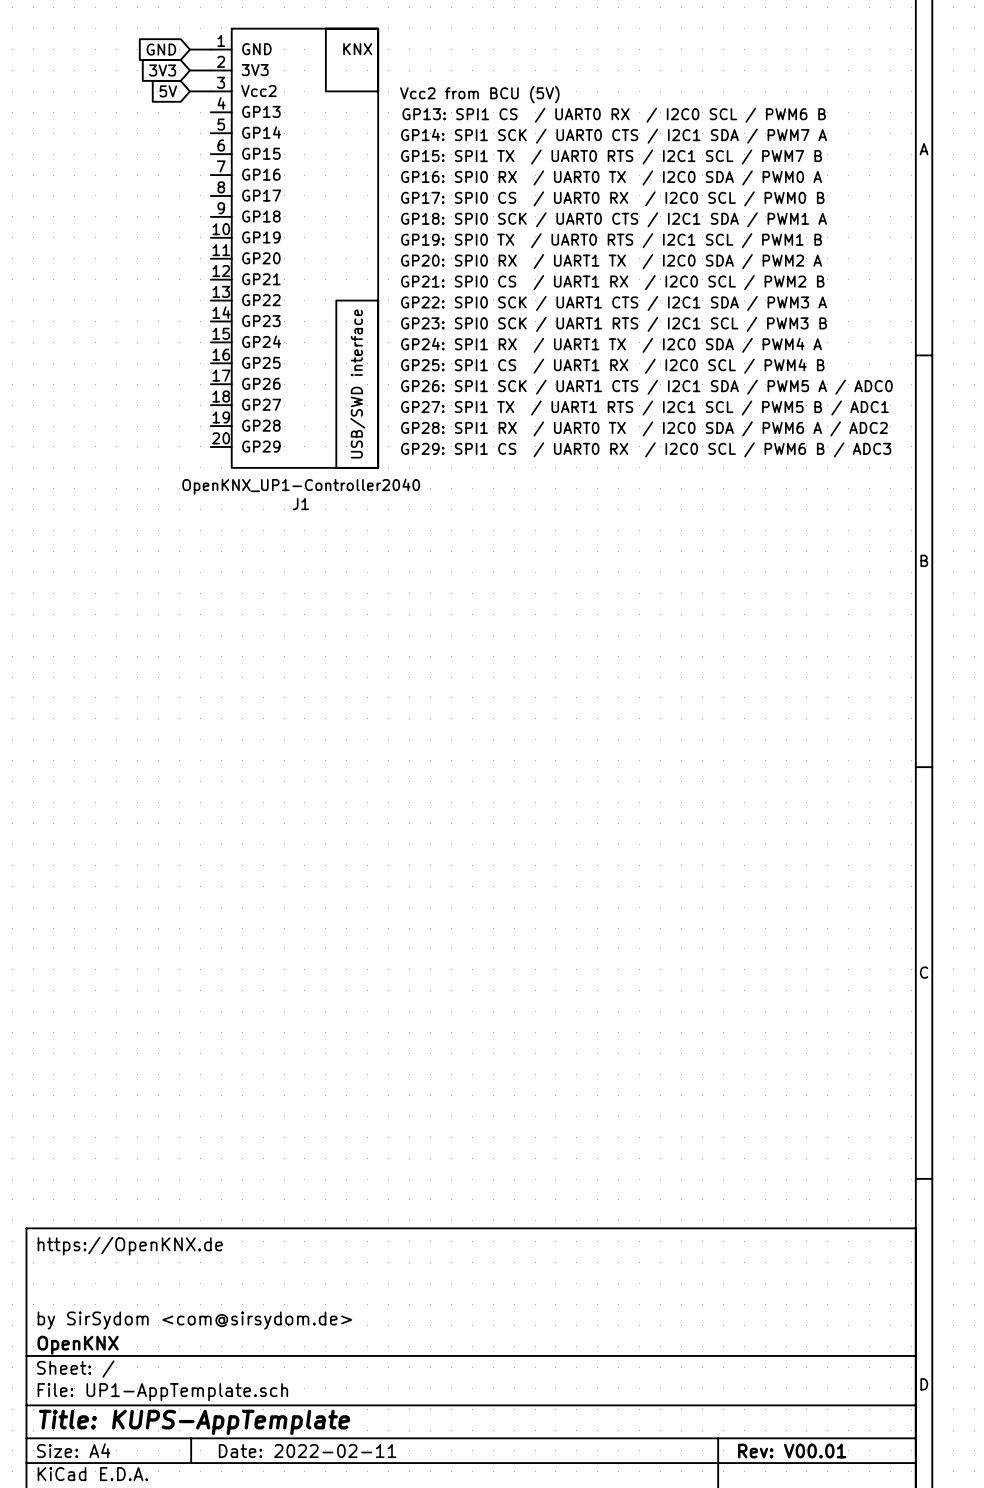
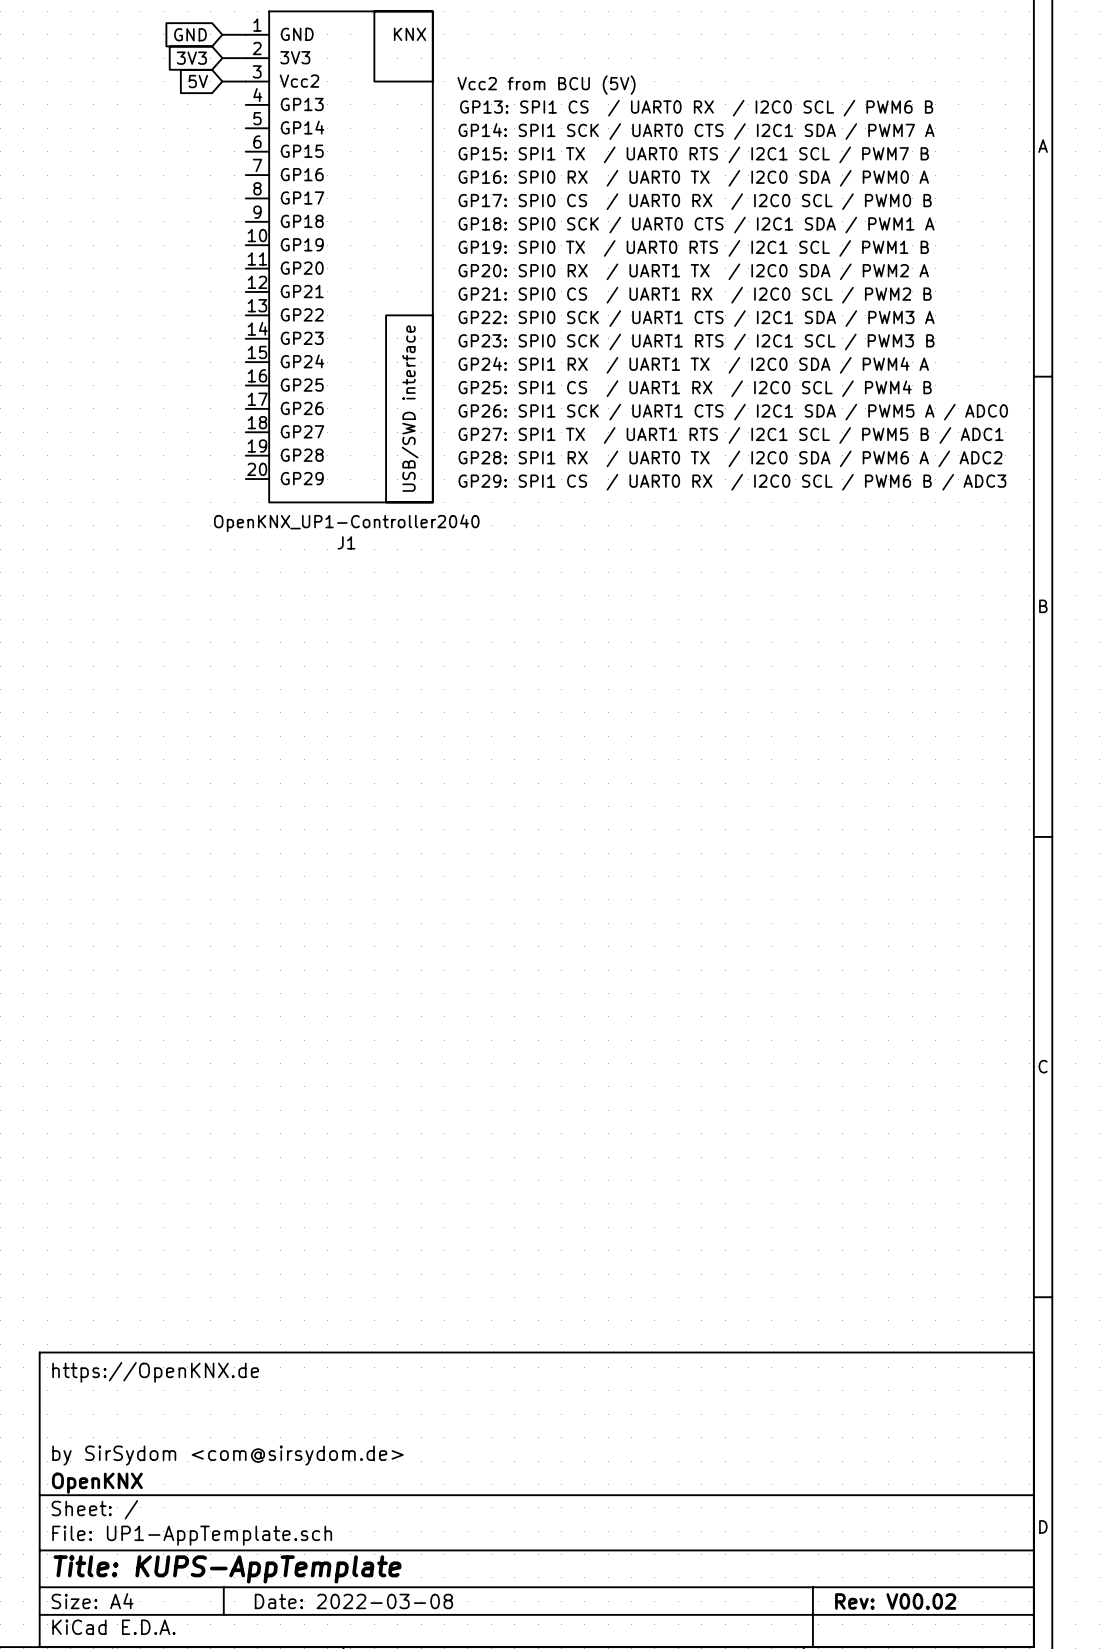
title block: Date: 2022-02-11 (307, 1451) -> Date: 2022-03-08 (353, 1601)
title block: Rev: V00.01 (792, 1451) -> Rev: V00.02 (895, 1601)

